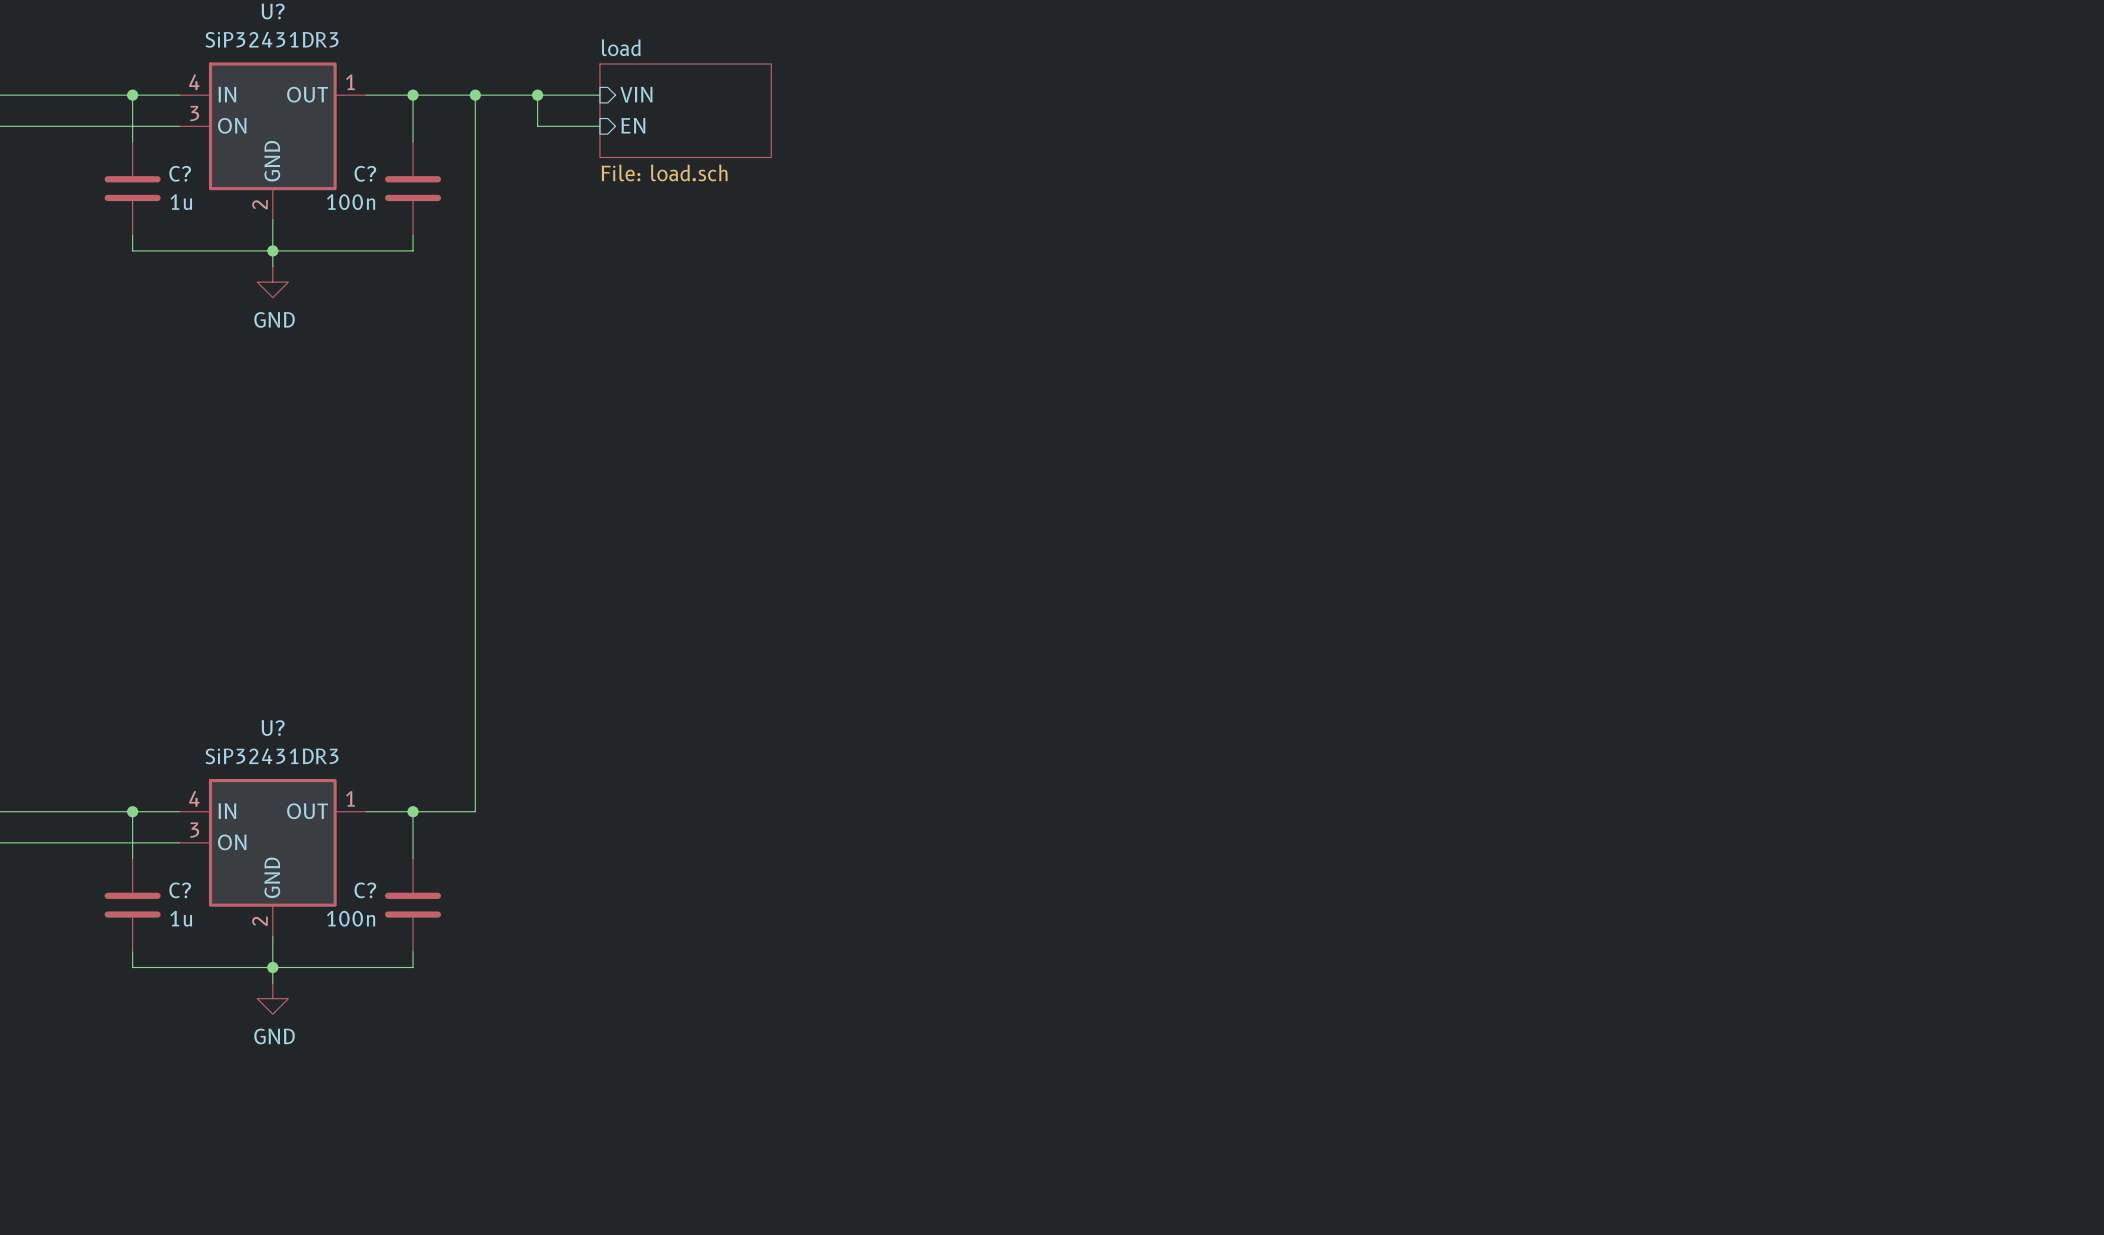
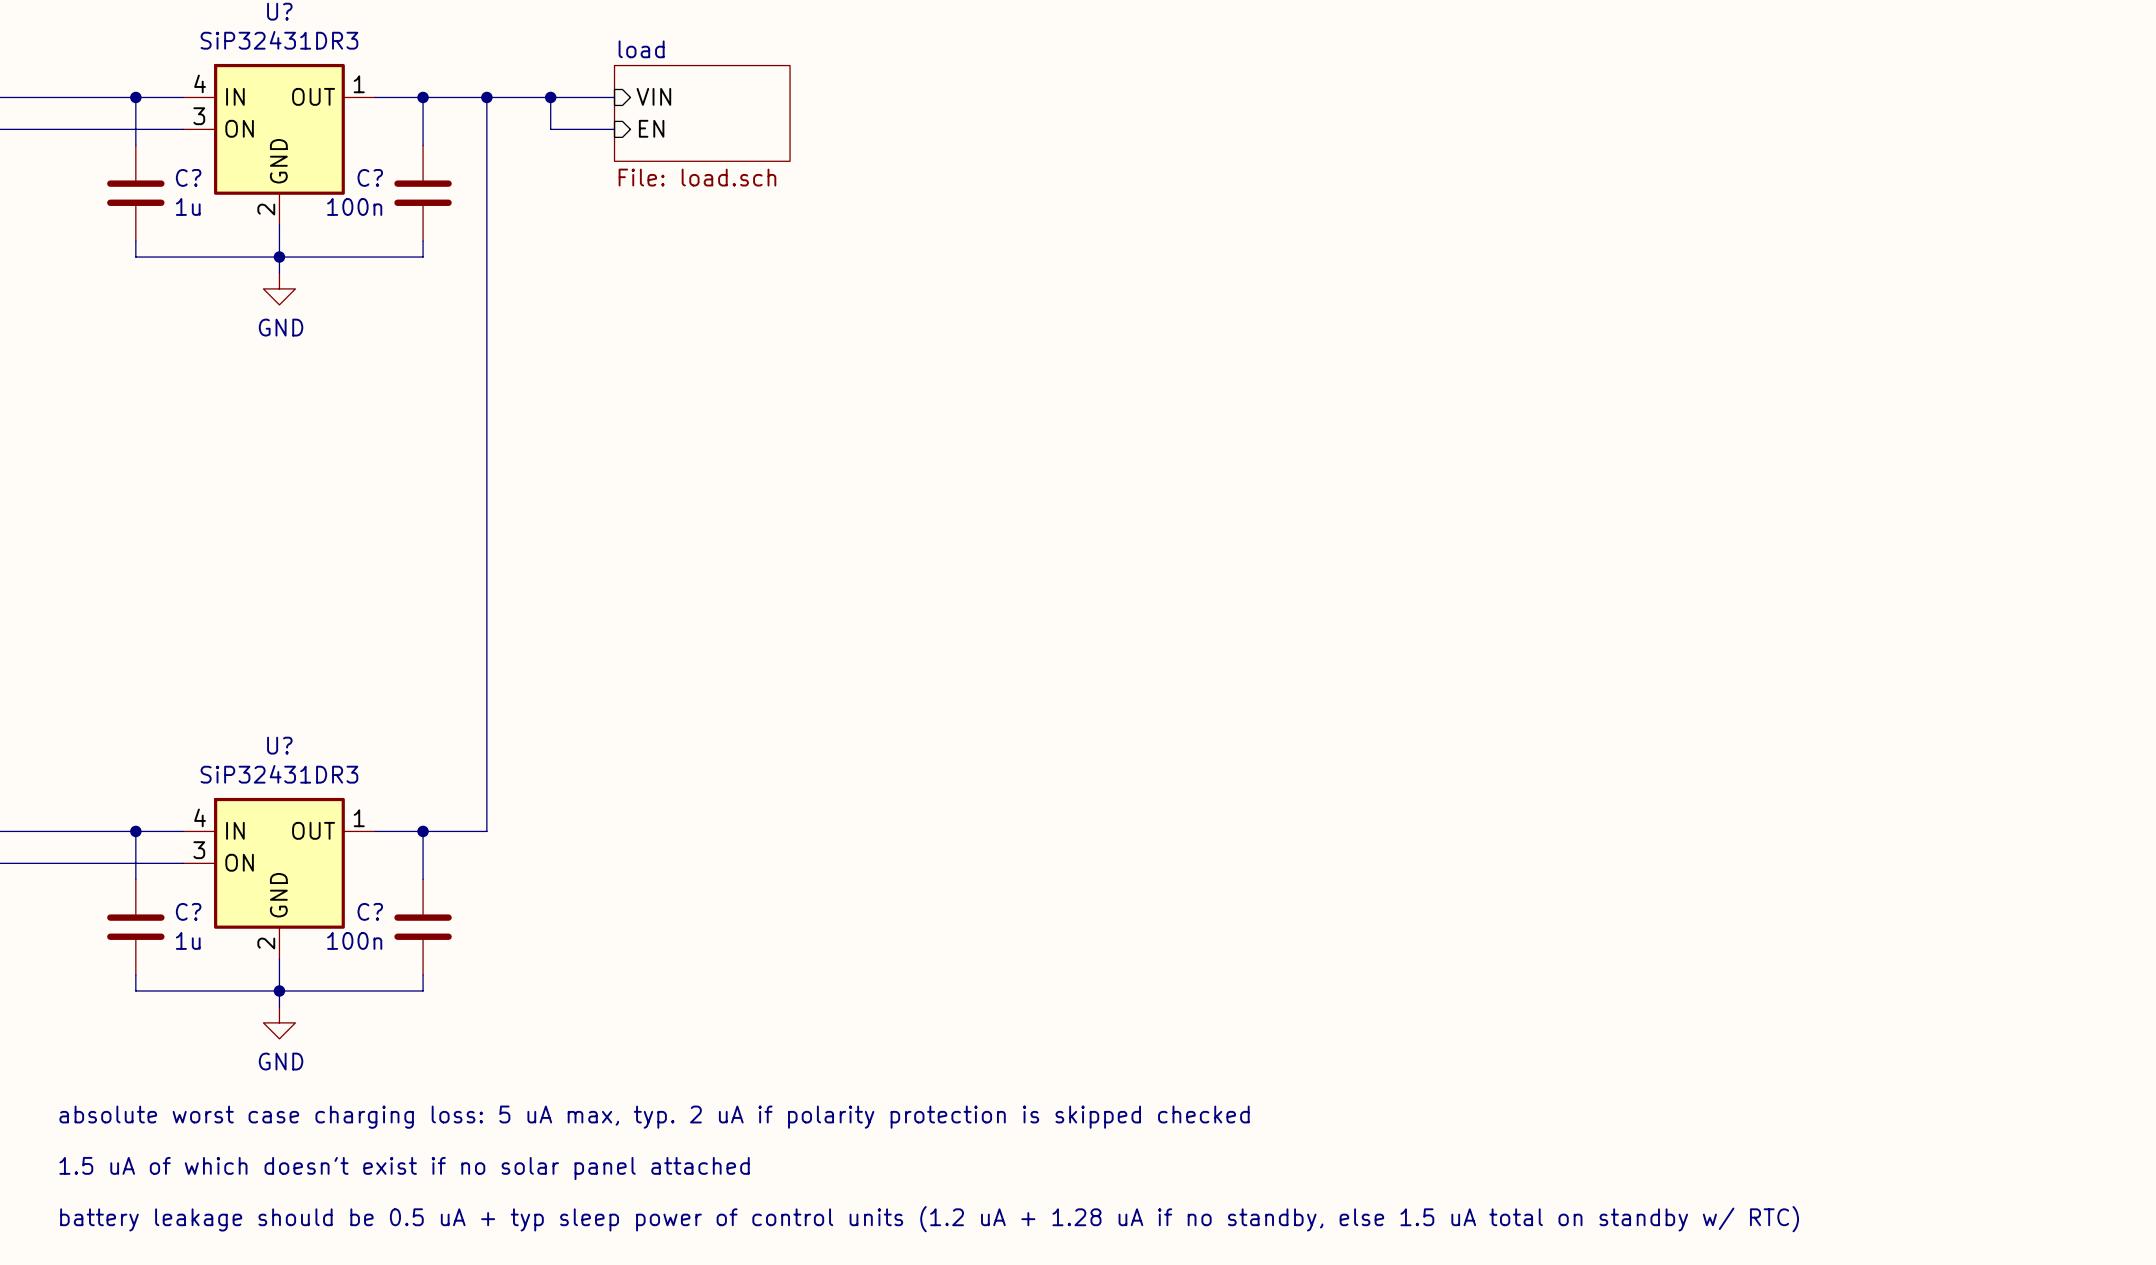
text: none -> absolute worst case charging loss: 5 uA max, typ. 2 uA if polarity protection is skipped checked (654, 1117)
text: none -> 1.5 uA of which doesn't exist if no solar panel attached (404, 1168)
text: none -> battery leakage should be 0.5 uA + typ sleep power of control units (1.2 uA + 1.28 uA if no standby, else 1.5 uA total on standby w/ RTC) (929, 1219)

